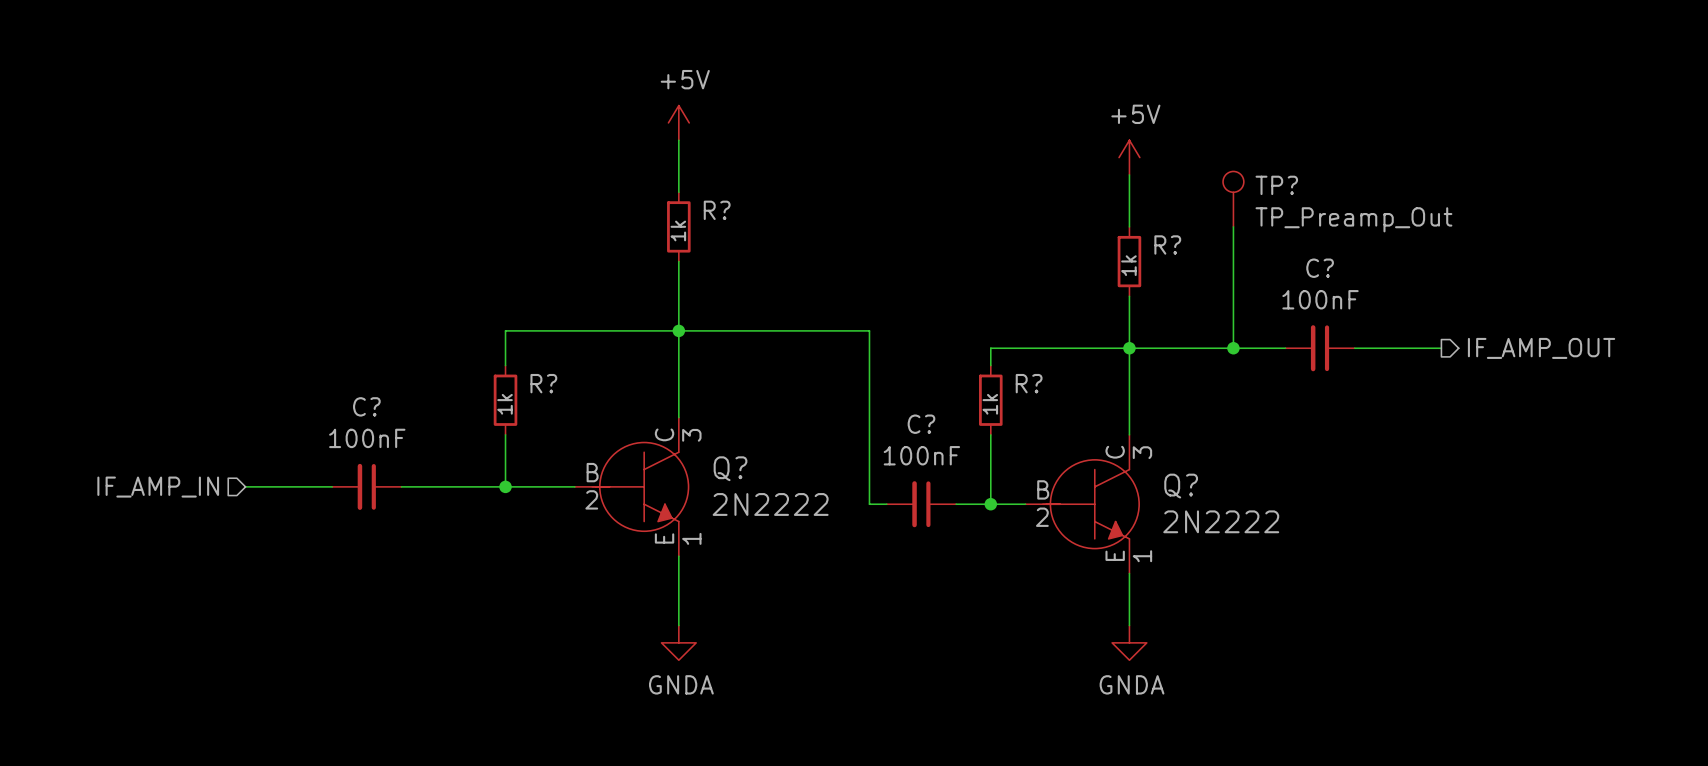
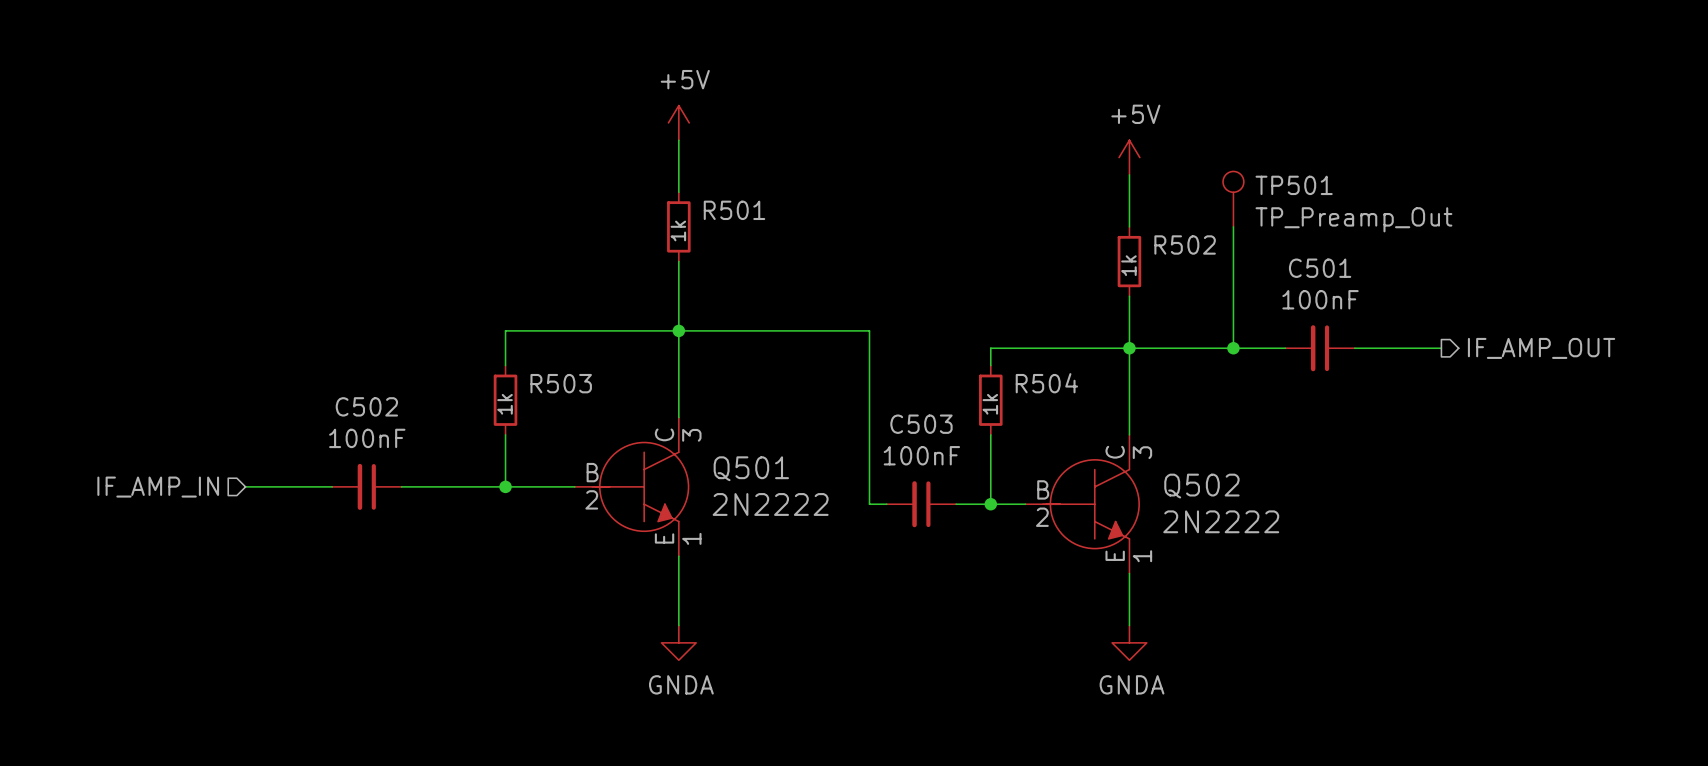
TP? name: TP? (1276, 185) -> TP501 (1294, 185)
R? name: R? (717, 210) -> R501 (734, 210)
R? name: R? (1167, 244) -> R502 (1185, 244)
C? name: C? (1320, 268) -> C501 (1320, 268)
R? name: R? (543, 383) -> R503 (561, 383)
R? name: R? (1029, 383) -> R504 (1046, 383)
C? name: C? (366, 406) -> C502 (366, 406)
C? name: C? (921, 424) -> C503 (921, 424)
Q? name: Q? (730, 468) -> Q501 (751, 468)
Q? name: Q? (1181, 486) -> Q502 (1201, 486)

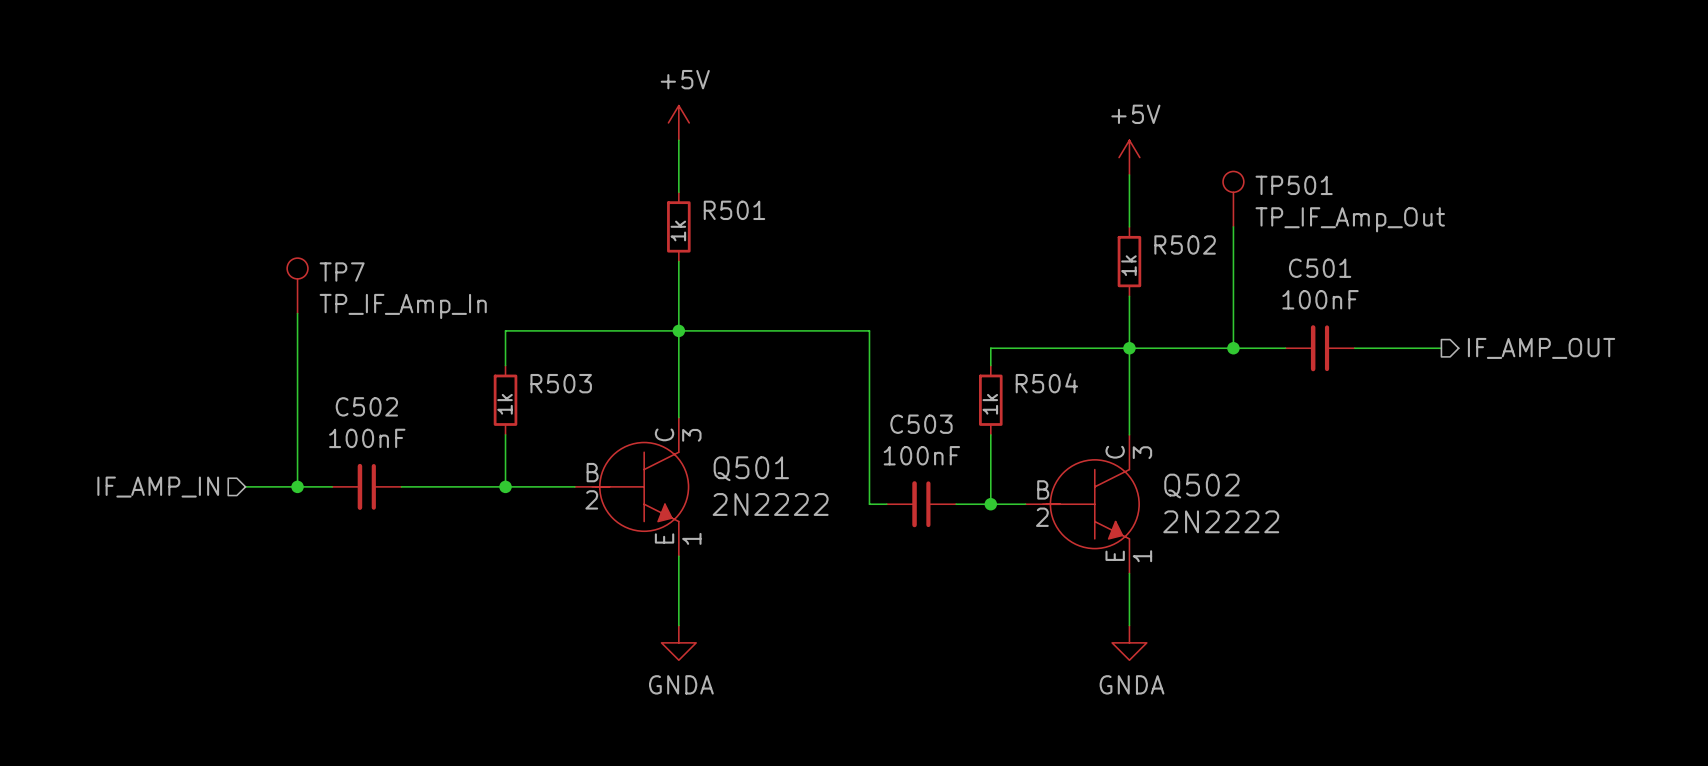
TP501 value: TP_Preamp_Out (1353, 219) -> TP_IF_Amp_Out (1350, 219)
TP7: none -> TP_IF_Amp_In (297, 285)
wire: none -> (297, 313) (297, 486)
junction: none -> (297, 486)

